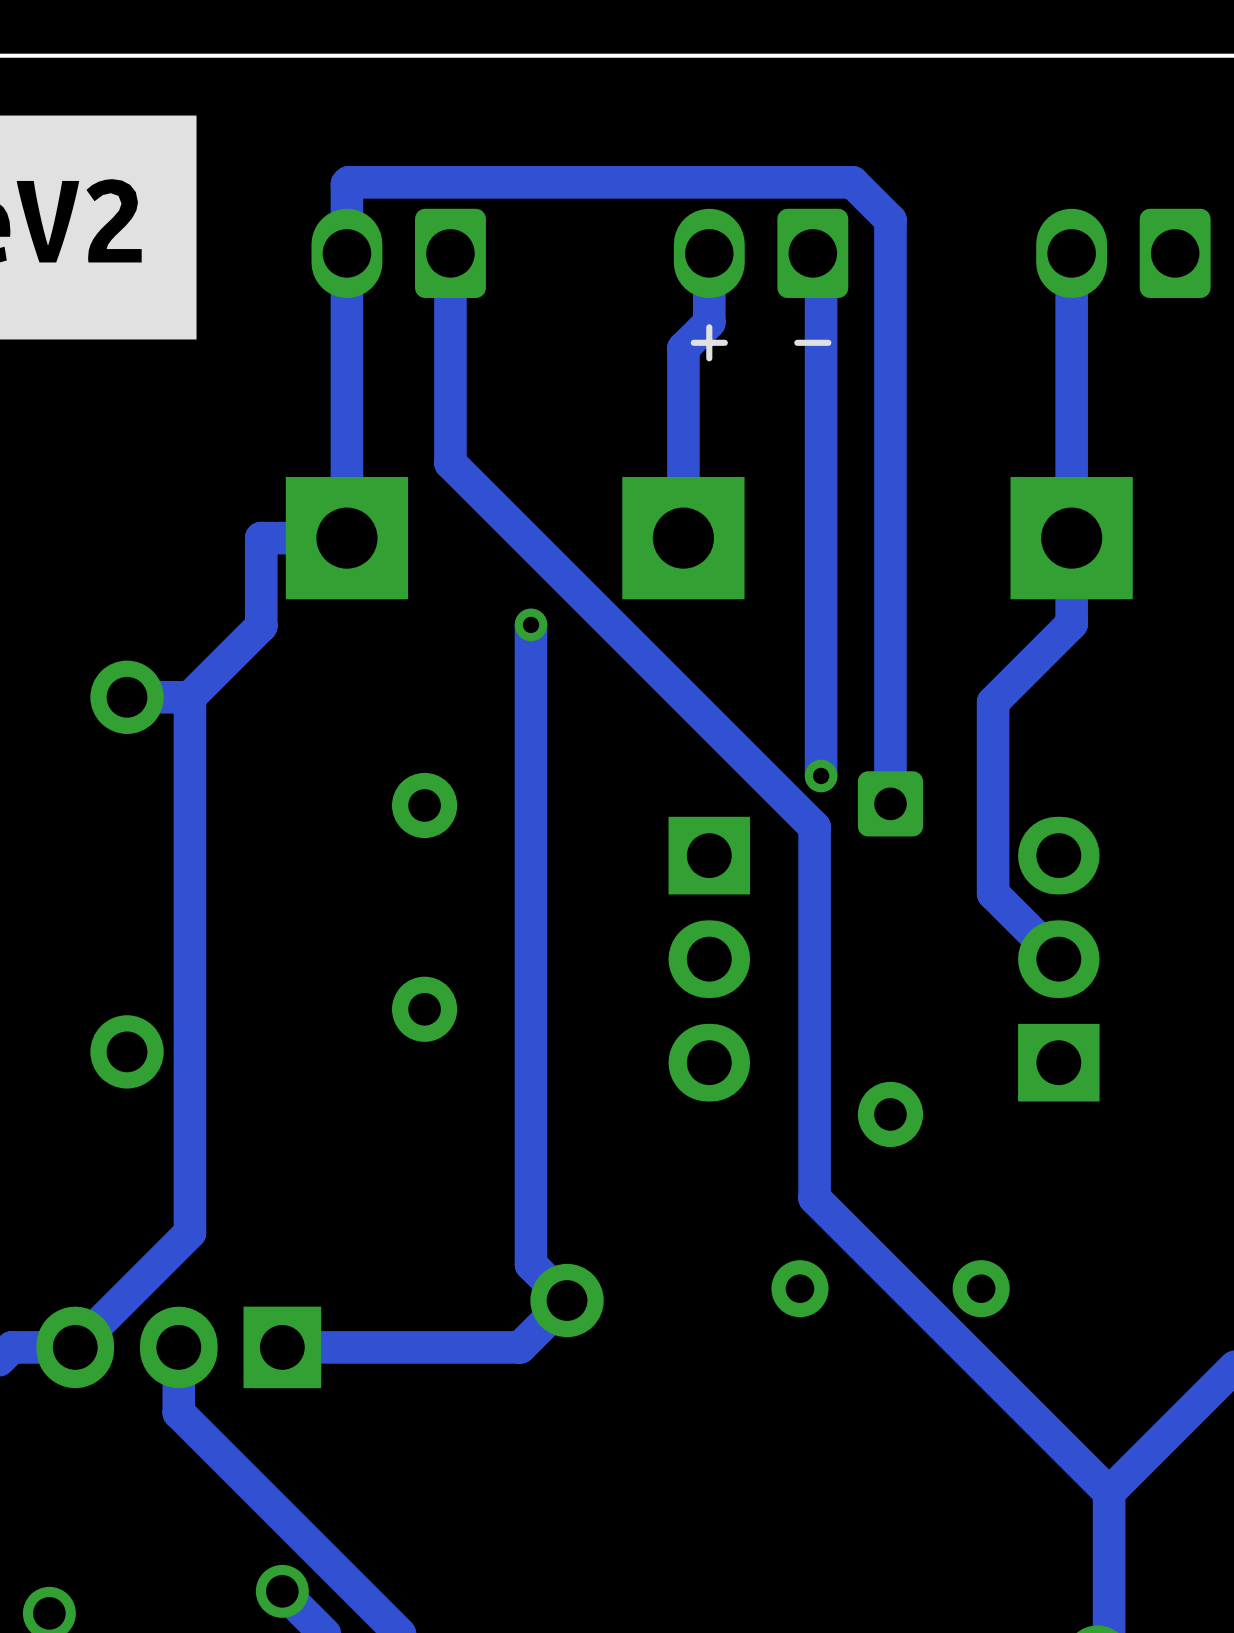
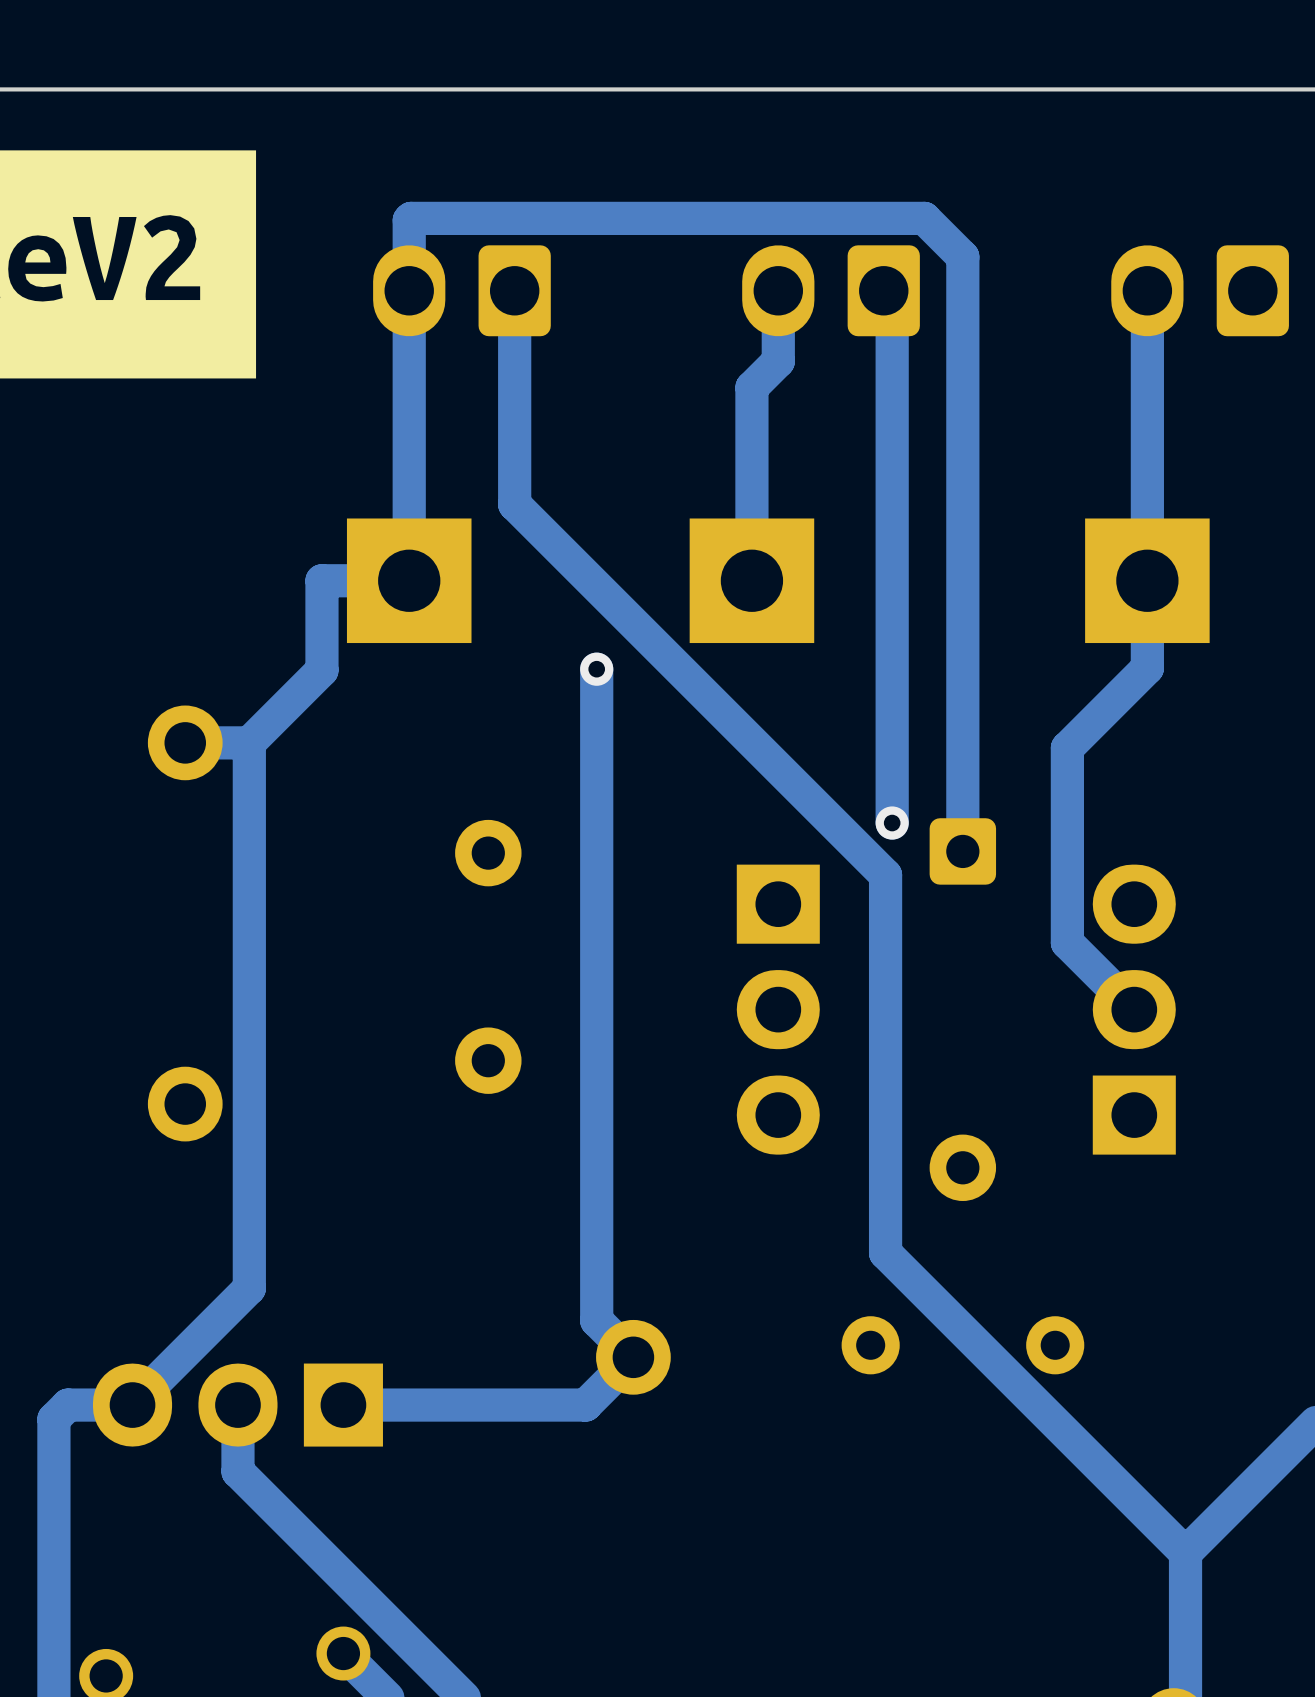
text: + (709, 342) -> none
text: - (812, 342) -> none

